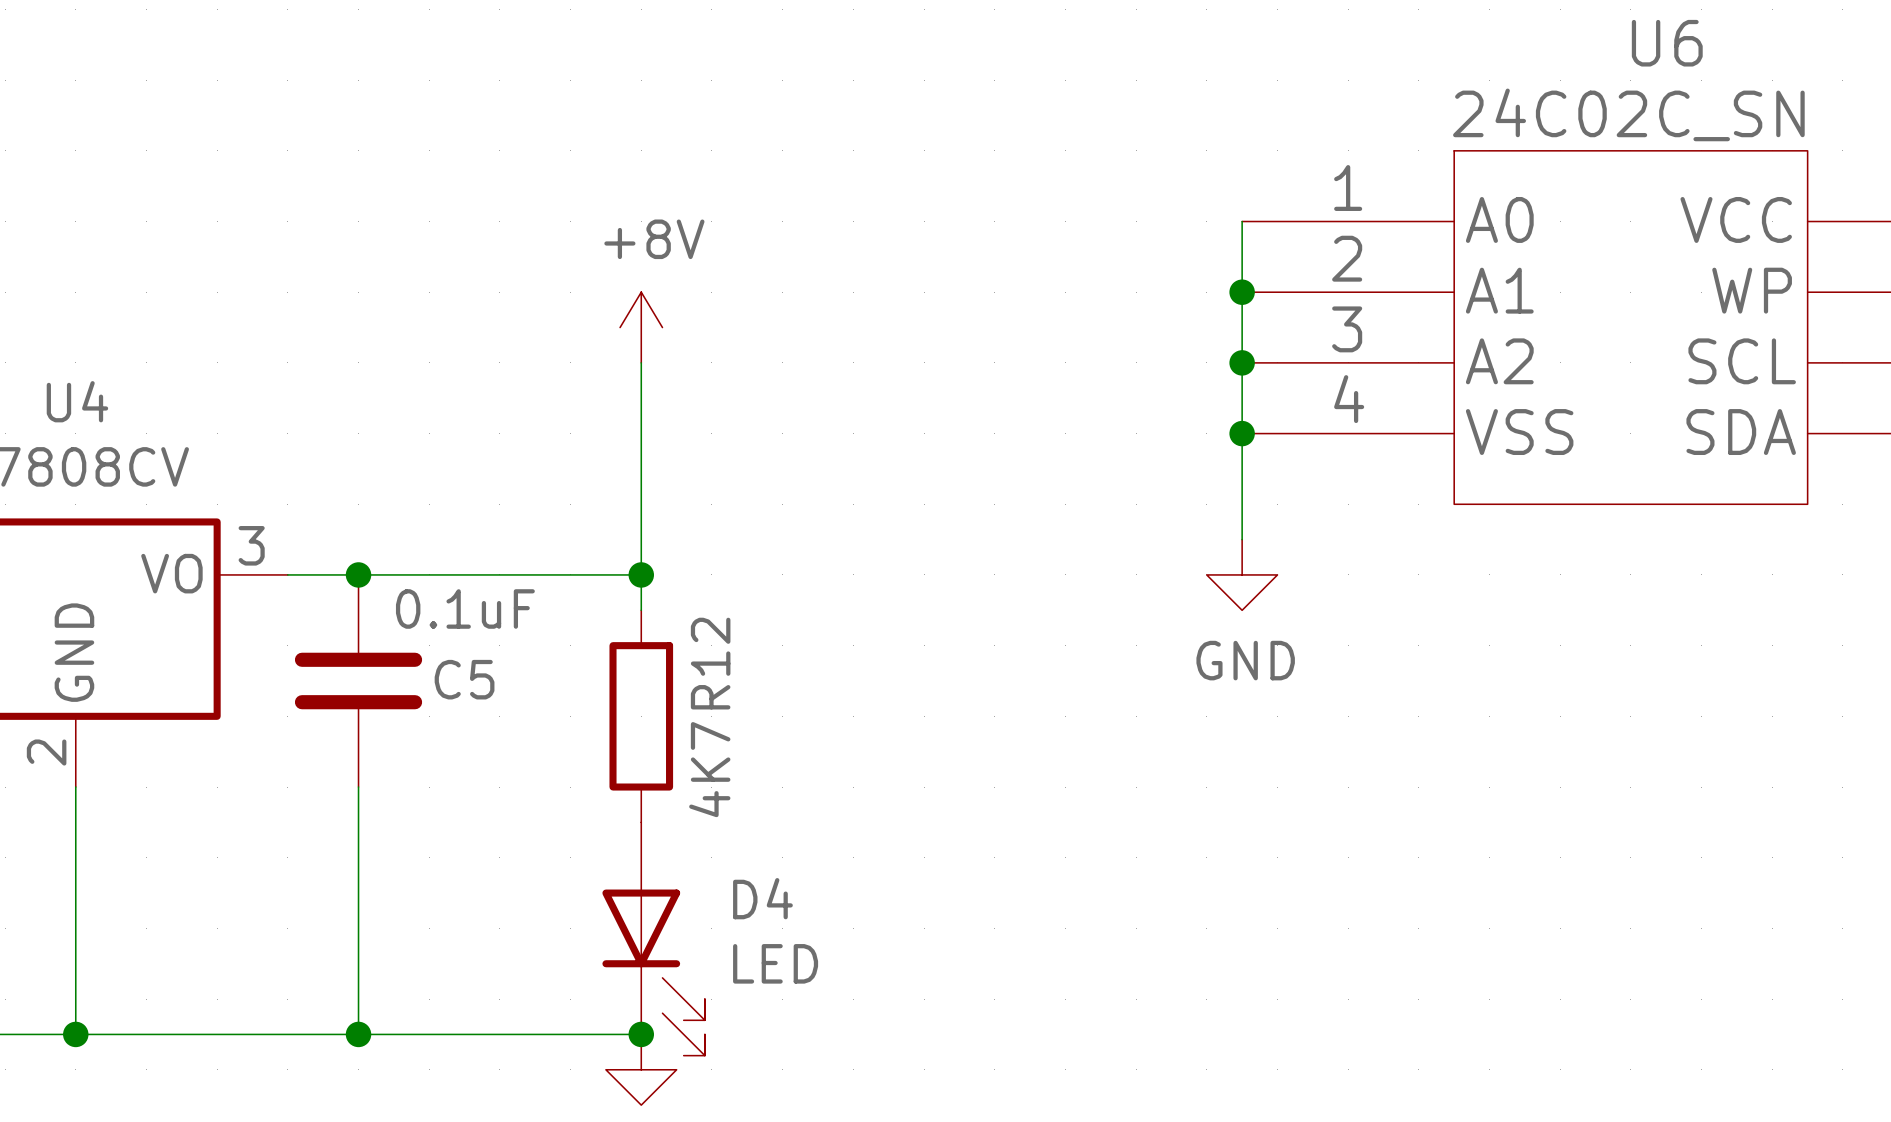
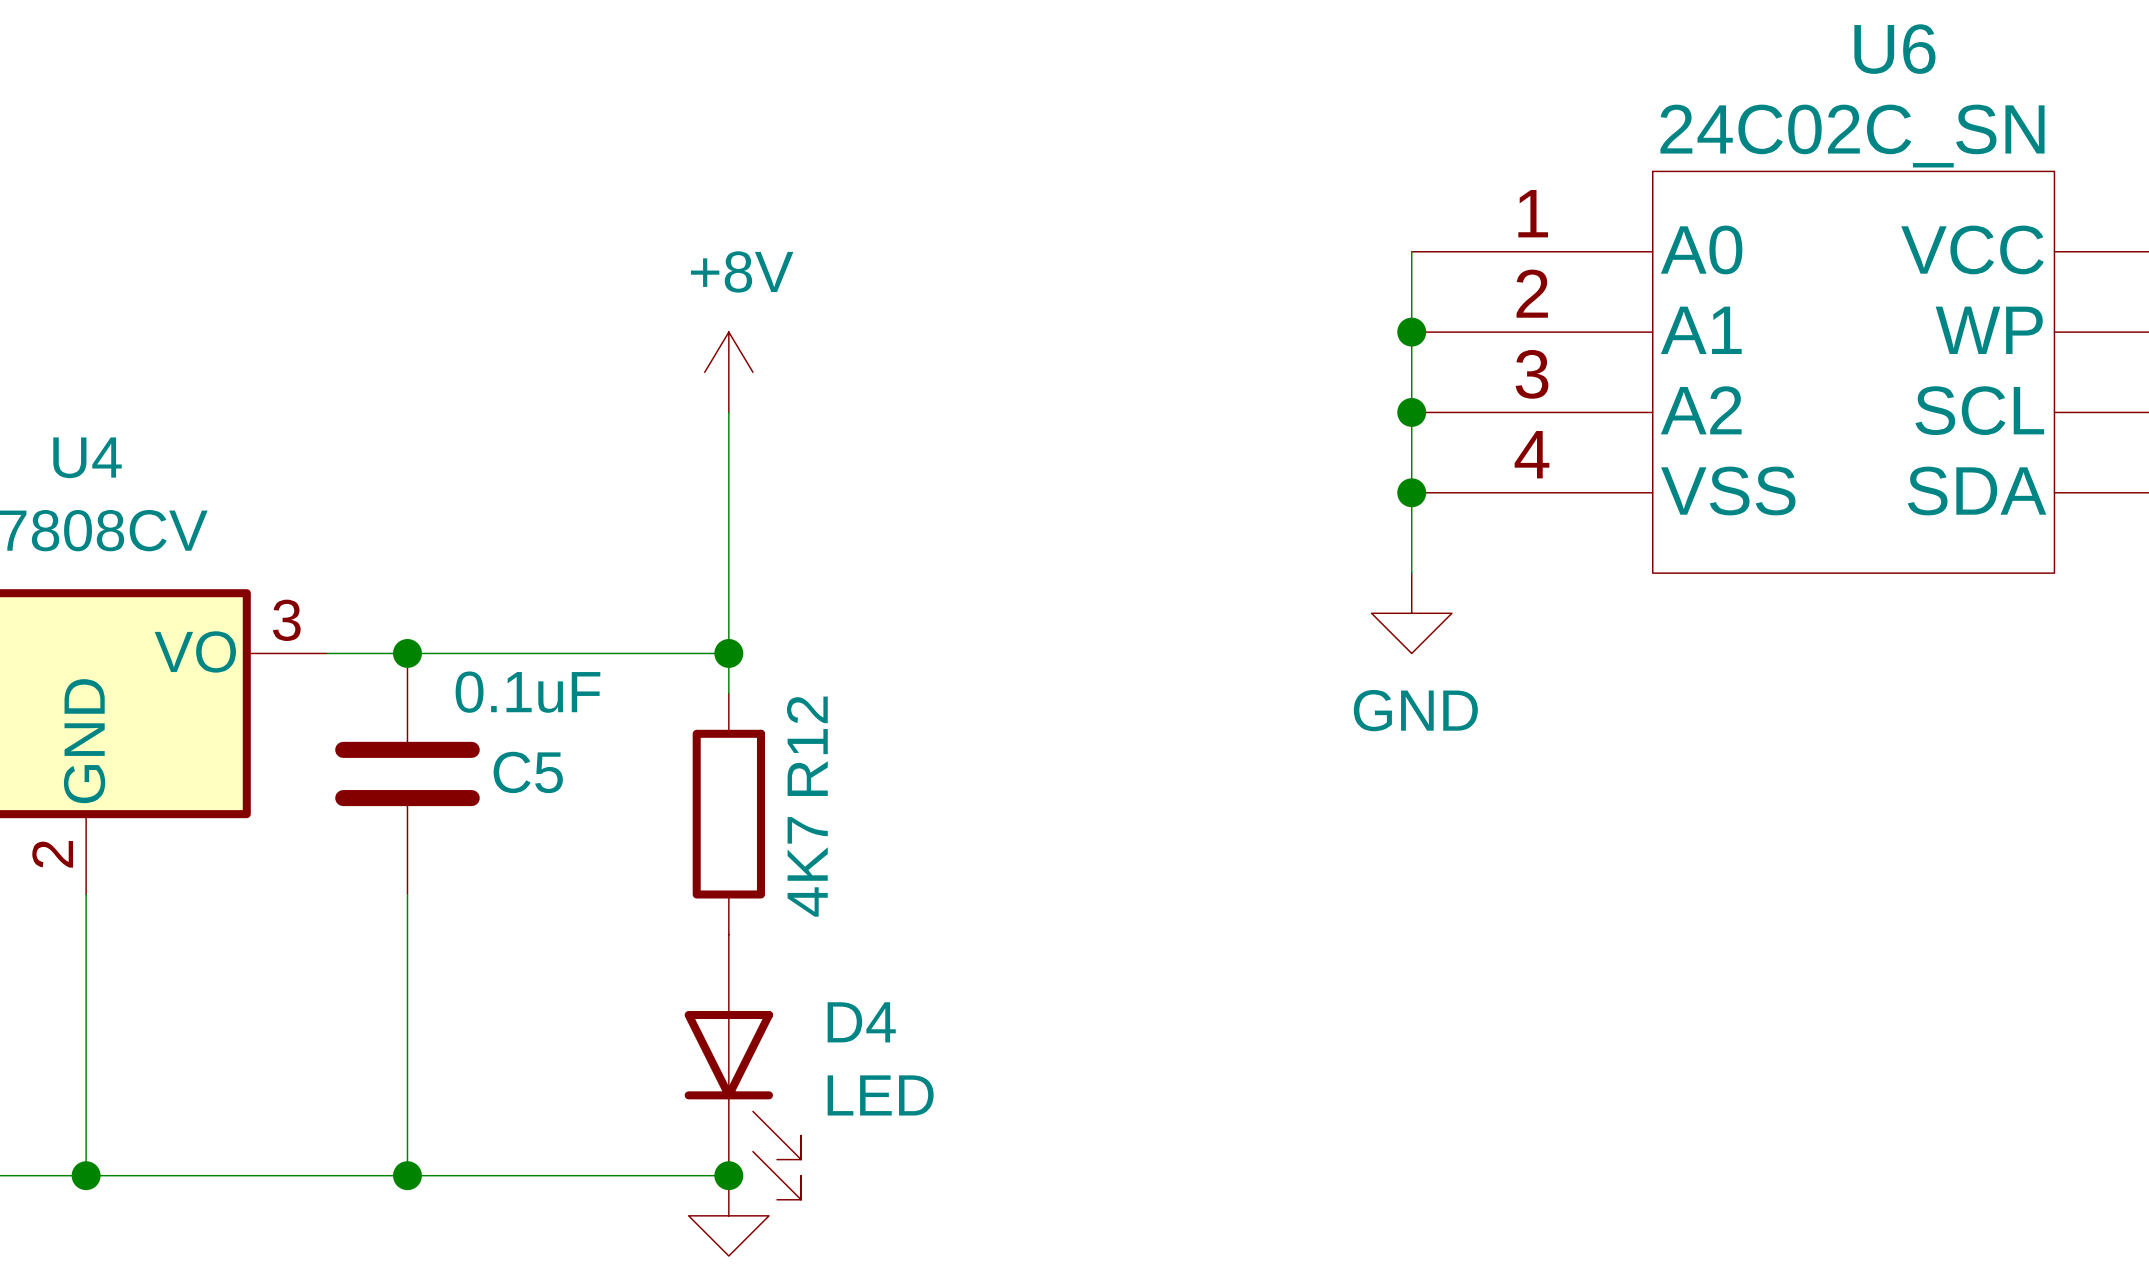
power symbol position: GND (1242, 574) -> GND (1411, 613)

